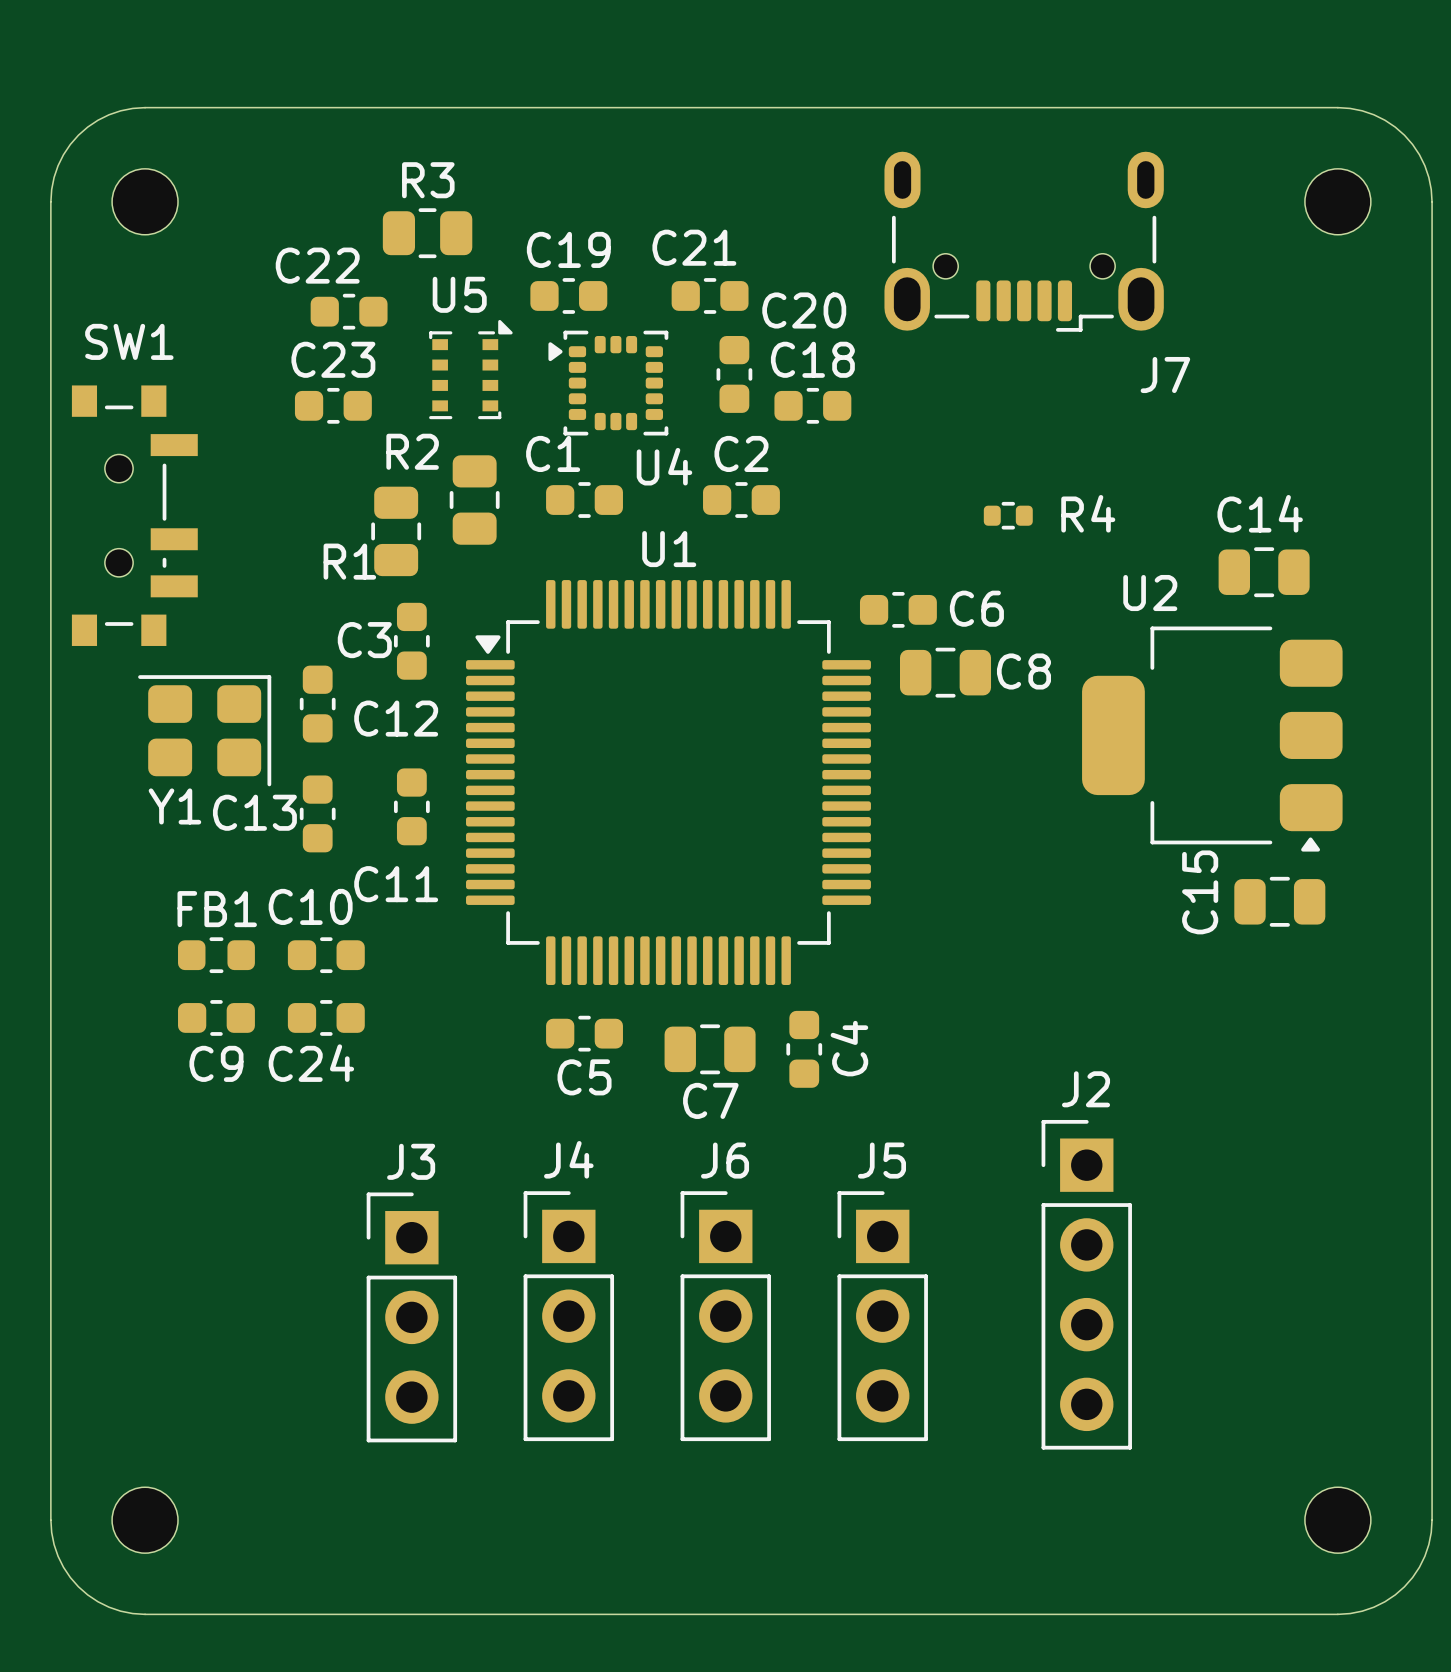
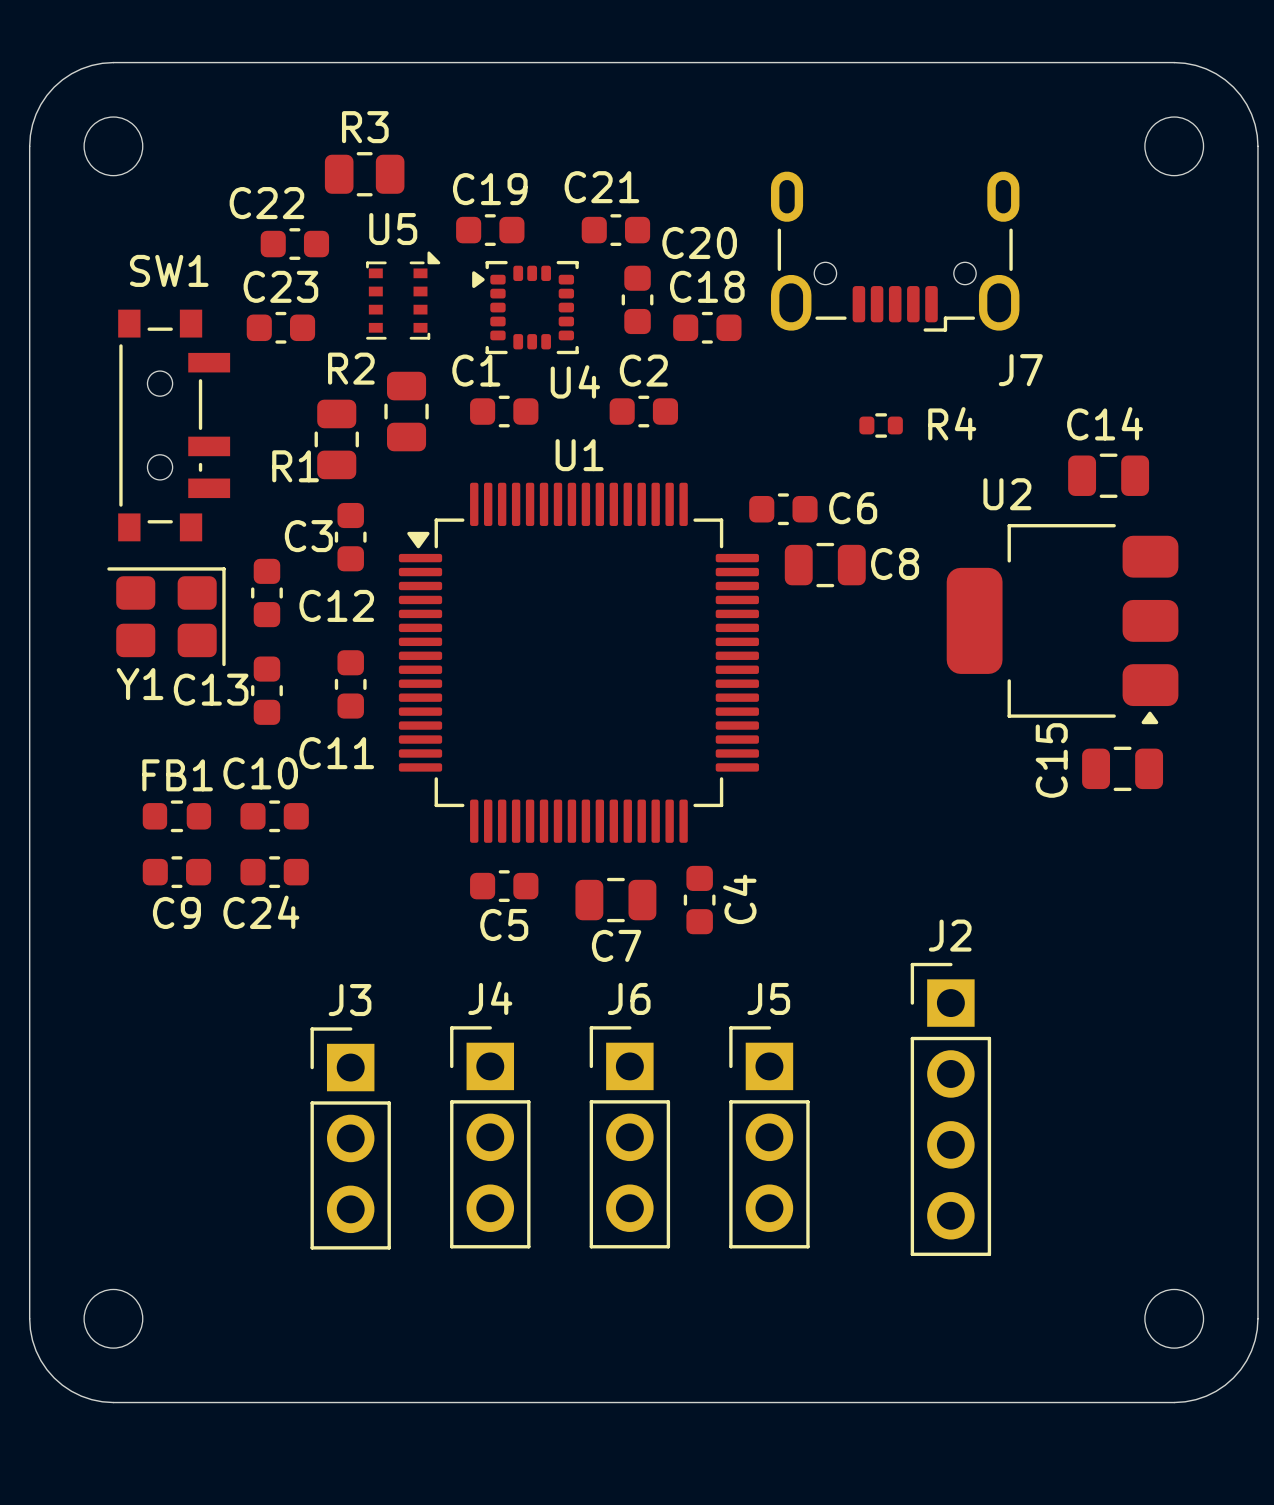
J7 position: (1024, 241) -> (895, 251)
SW1 footprint: [71, 385, 198, 646] -> [118, 309, 231, 542]

